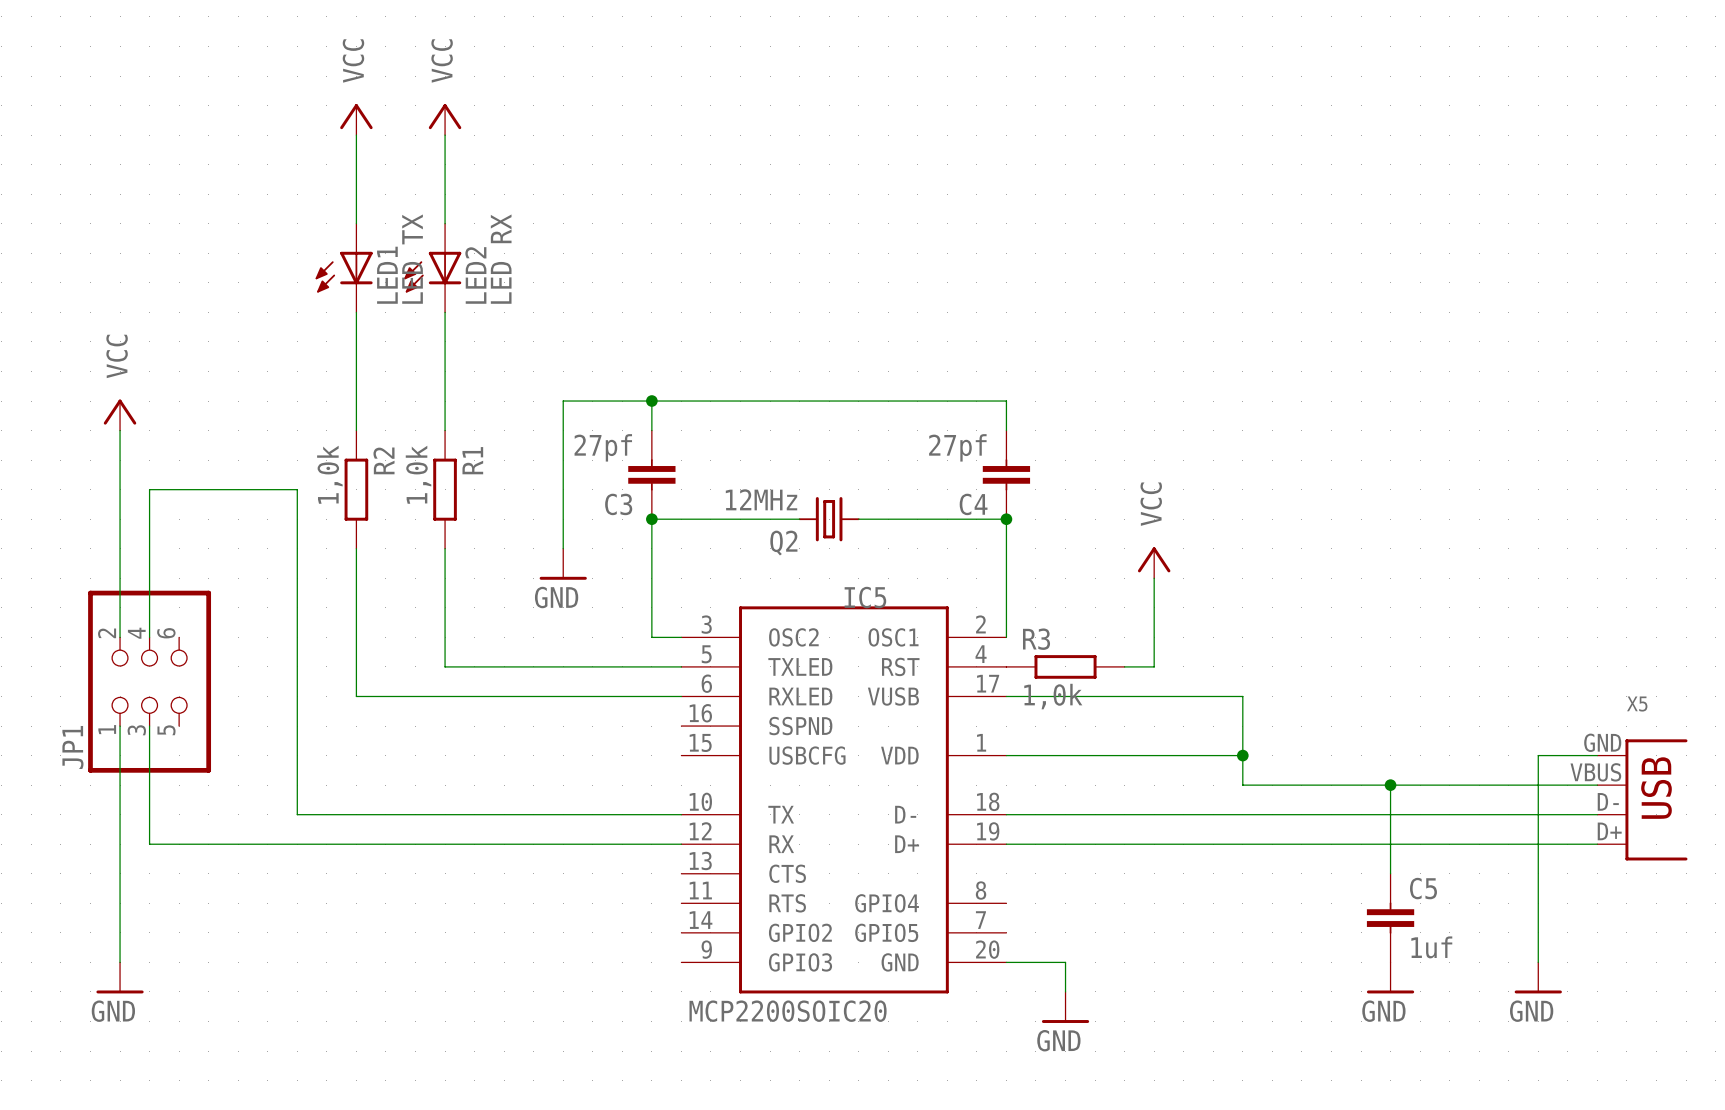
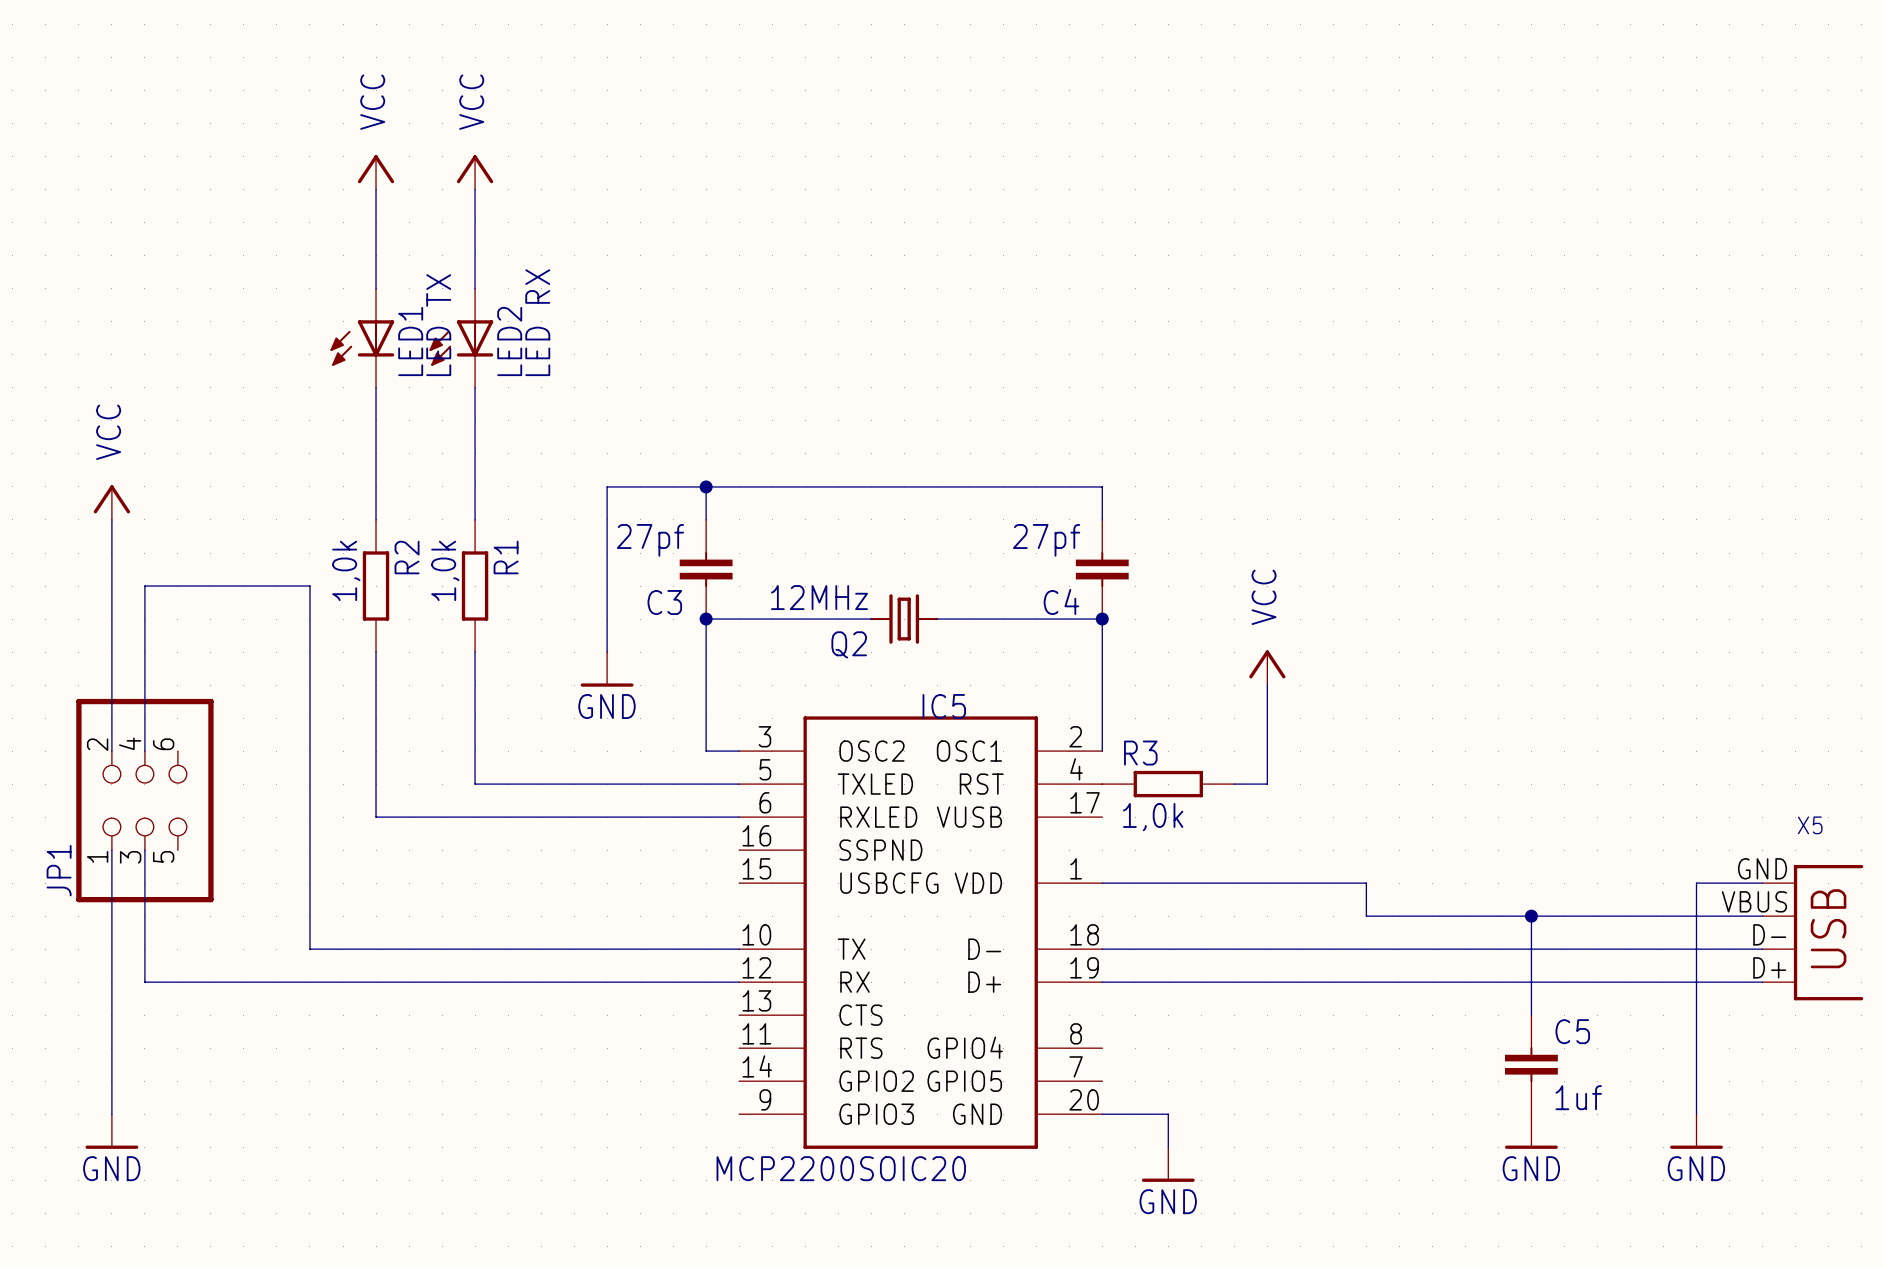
wire: (1006, 696) (1242, 696) (1242, 755) -> none
junction: (1242, 755) -> none

